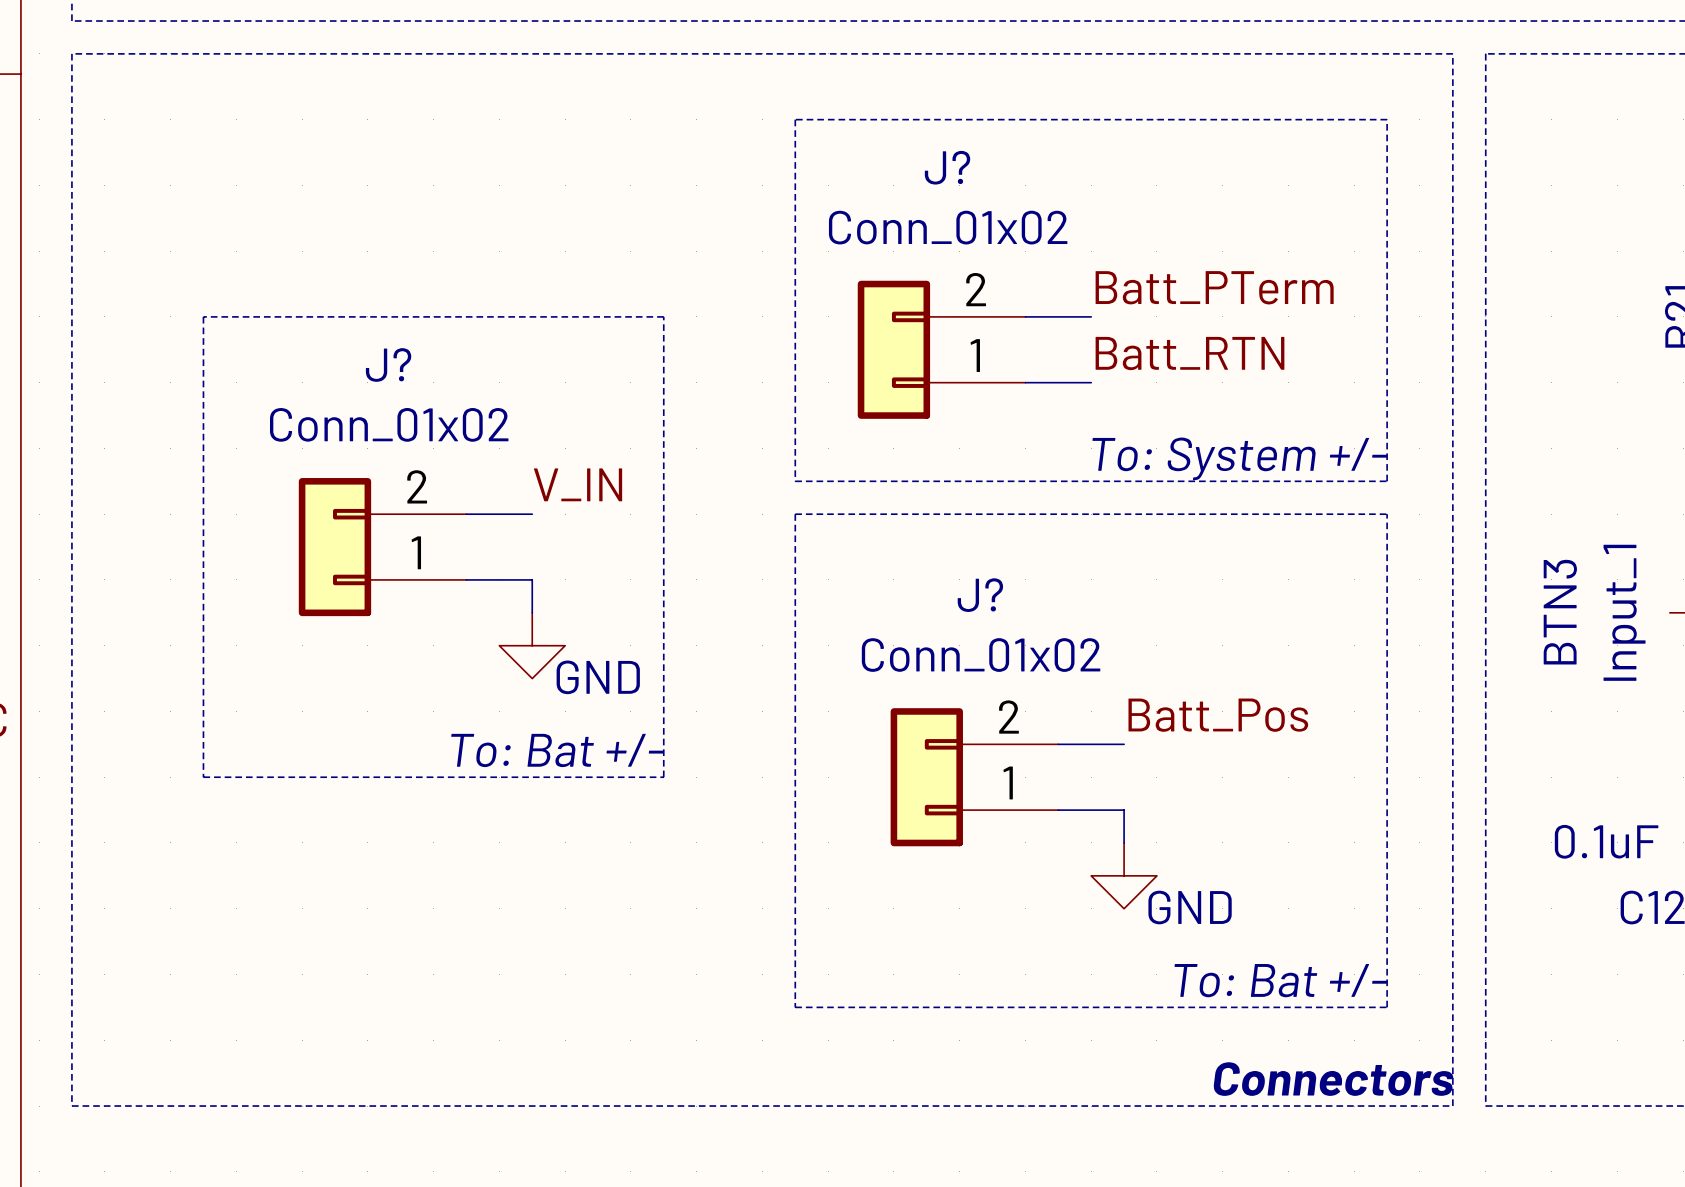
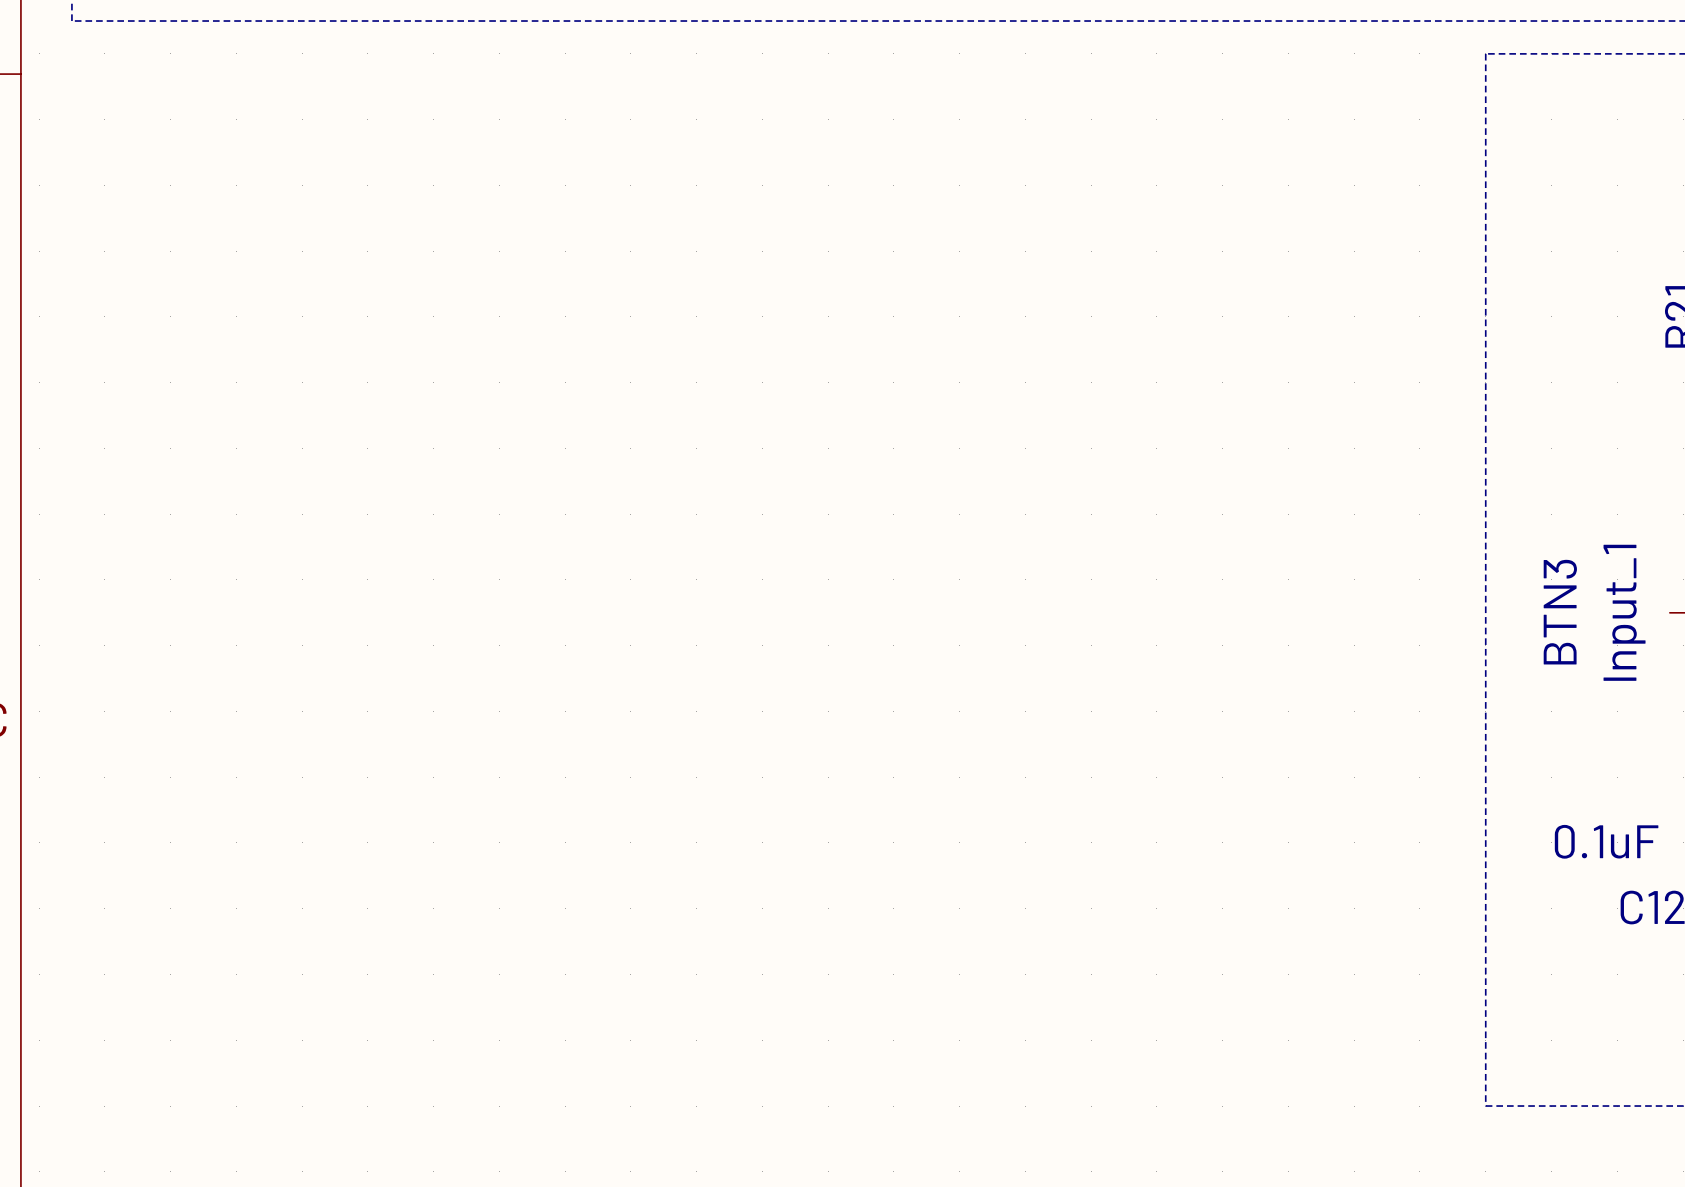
line: (71, 53) (1452, 53) (1452, 1106) (71, 1106) (71, 53) -> none
line: (795, 119) (795, 481) (1387, 481) (1387, 119) (795, 119) -> none
label: Batt_PTerm (1214, 287) -> none
line: (203, 316) (203, 777) (663, 777) (663, 316) (203, 316) -> none
wire: (1025, 316) (1091, 316) -> none
J?: Conn_01x02 (941, 349) -> none
label: Batt_RTN (1190, 353) -> none
wire: (1025, 382) (1091, 382) -> none
text: To: System +/- (1239, 458) -> none
label: V_IN (578, 484) -> none
wire: (466, 514) (532, 514) -> none
line: (795, 514) (795, 1007) (1387, 1007) (1387, 514) (795, 514) -> none
J?: Conn_01x02 (382, 547) -> none
wire: (466, 579) (532, 579) (532, 612) -> none
power symbol: GND (532, 645) -> none
label: Batt_Pos (1218, 715) -> none
wire: (1058, 744) (1124, 744) -> none
text: To: Bat +/- (557, 750) -> none
J?: Conn_01x02 (974, 777) -> none
wire: (1058, 810) (1124, 810) (1124, 842) -> none
power symbol: GND (1124, 875) -> none
text: To: Bat +/- (1280, 980) -> none
text: Connectors (1333, 1079) -> none

